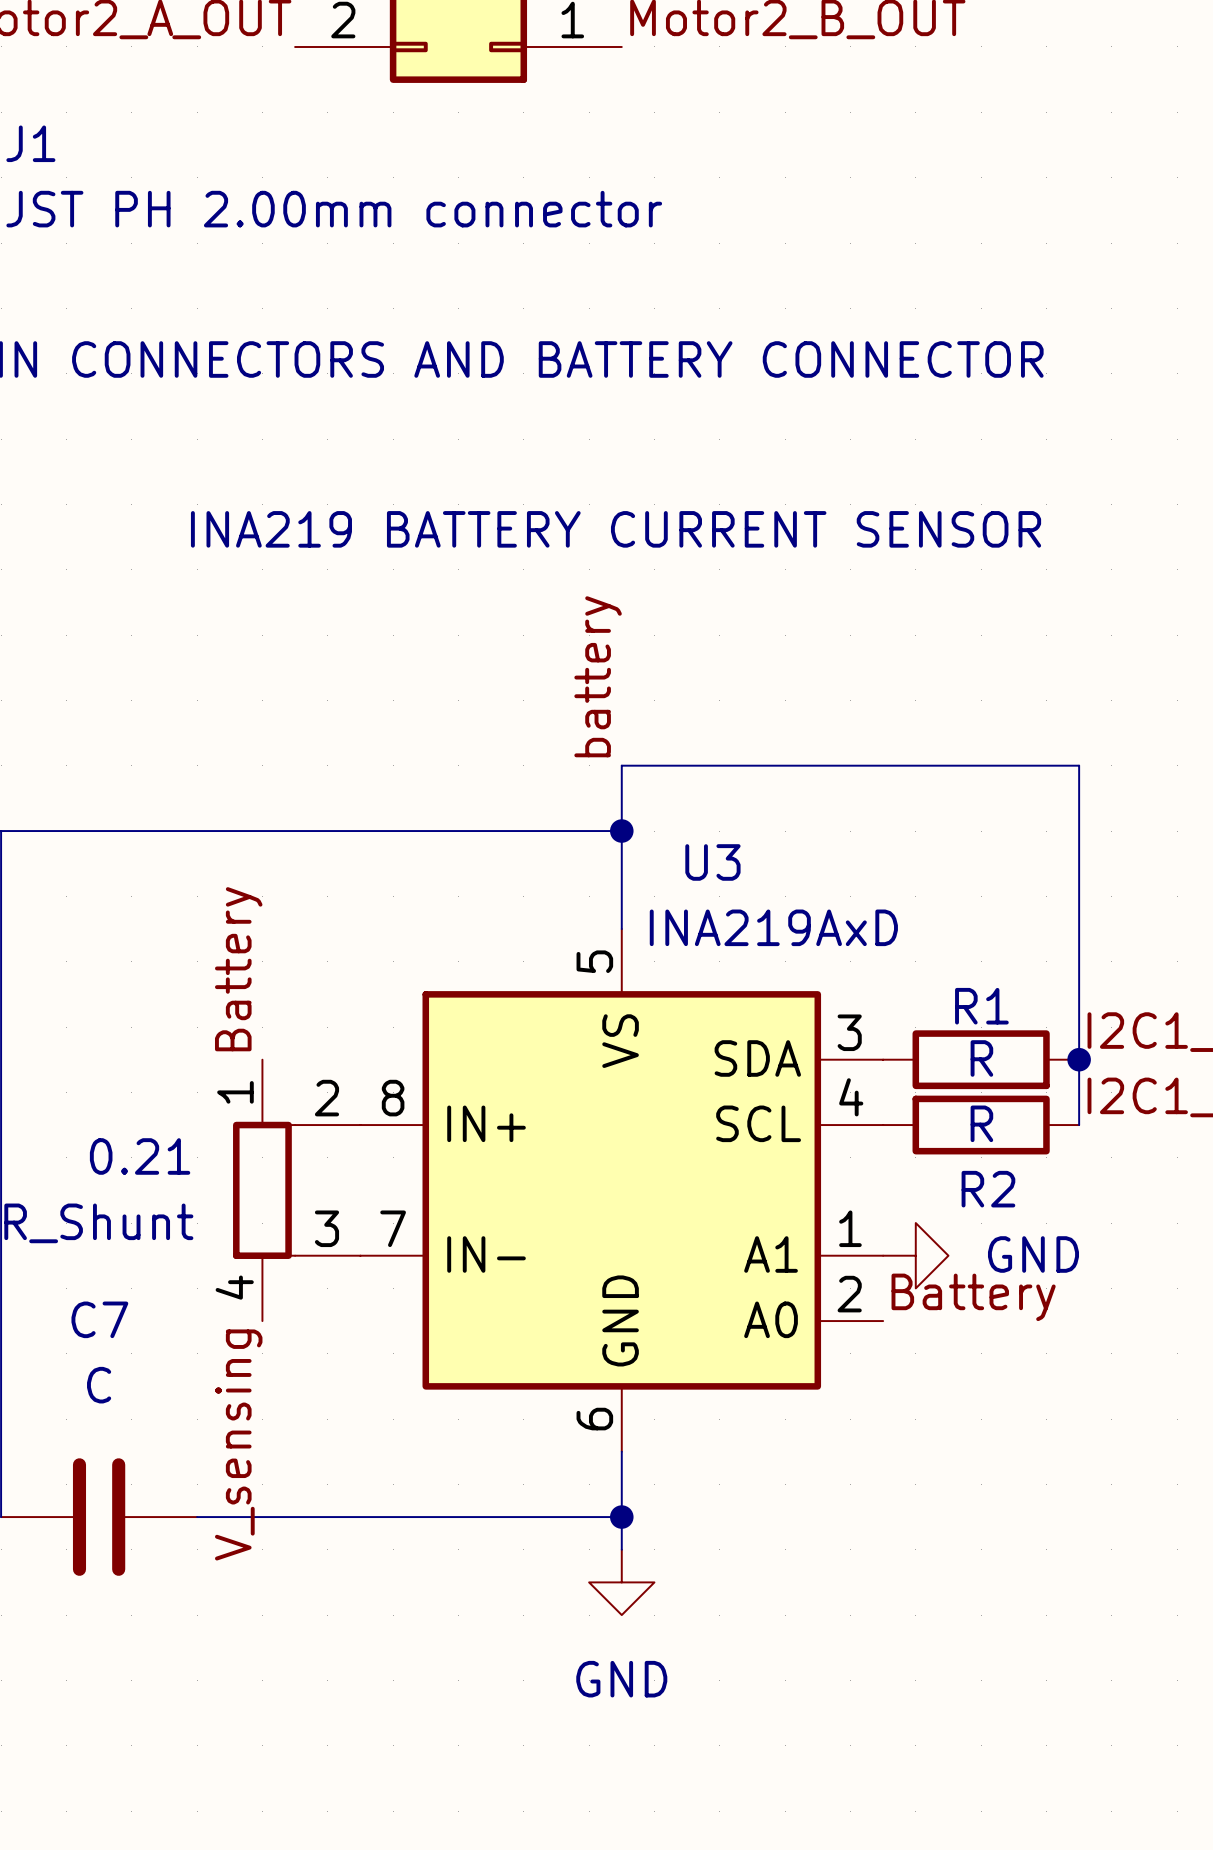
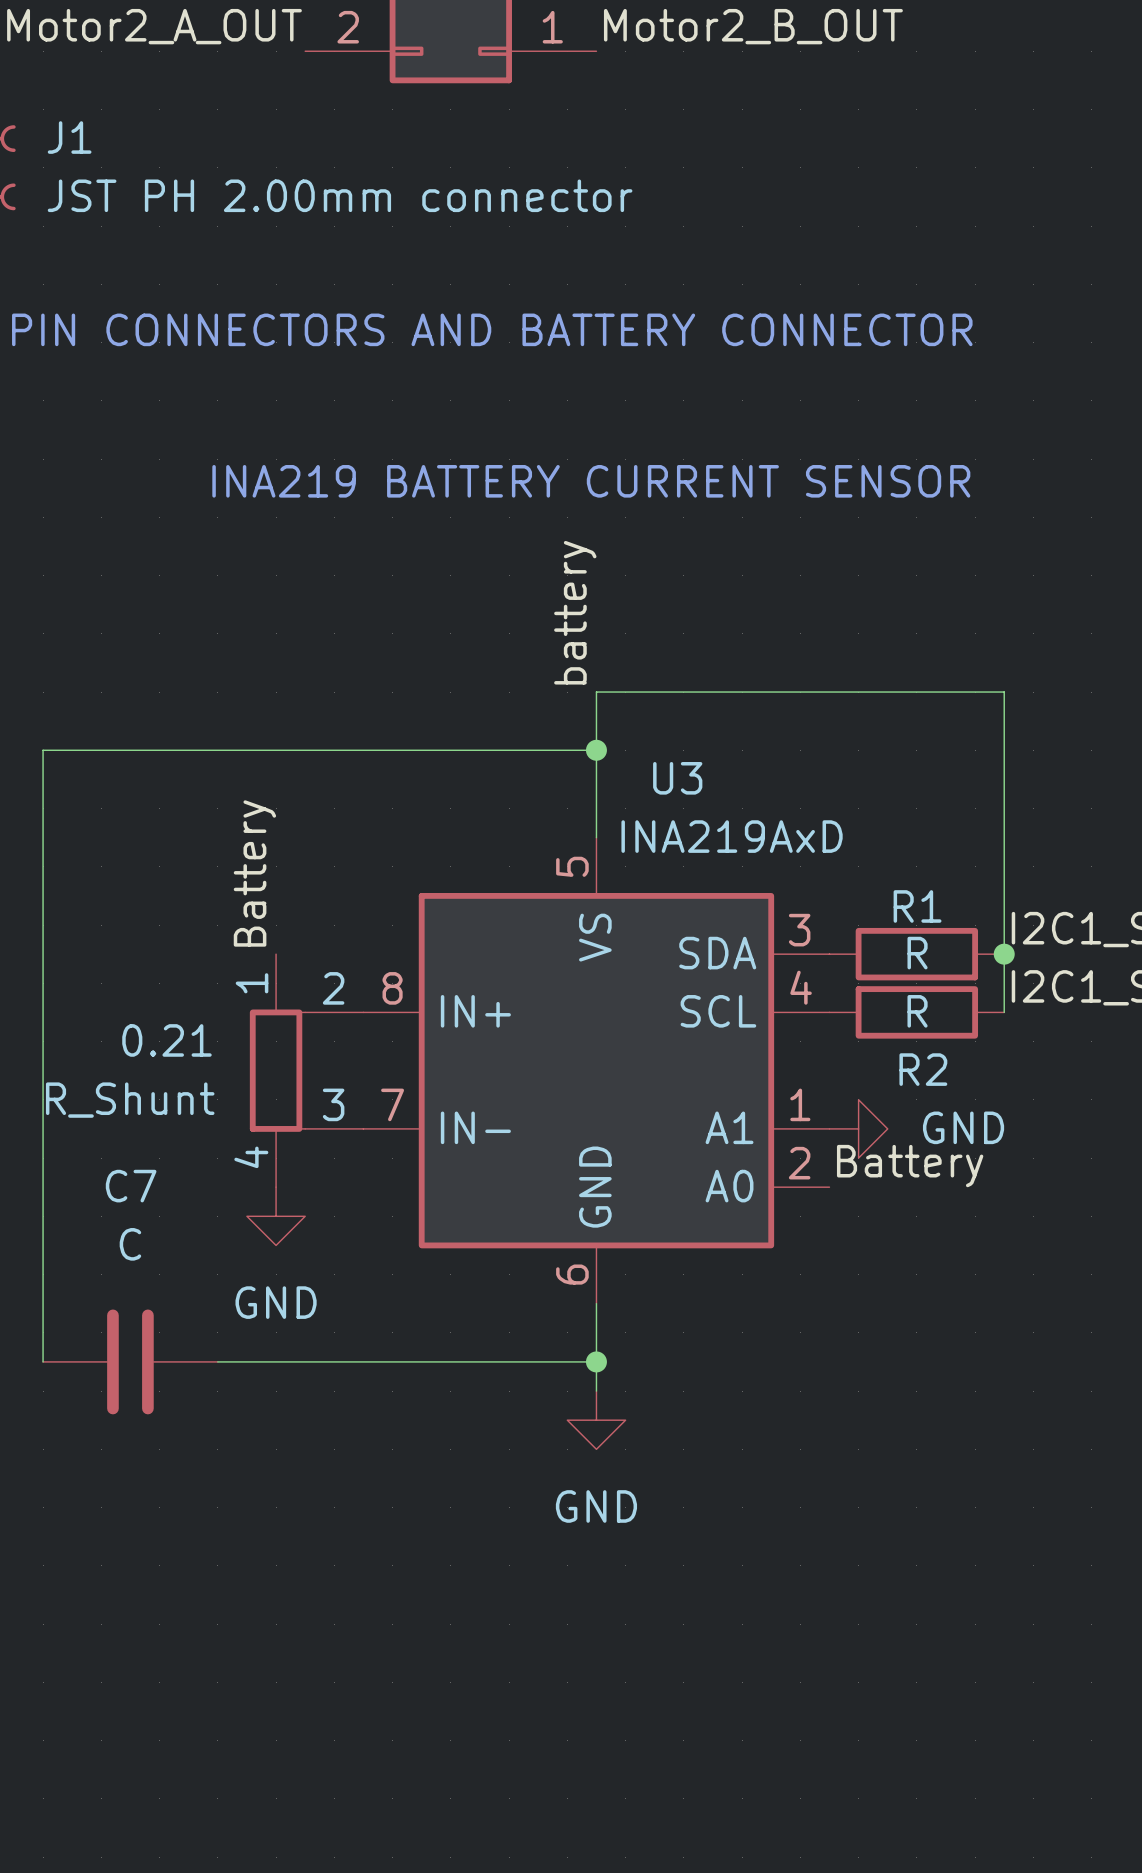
power symbol: none -> GND (276, 1216)
label: V_sensing (238, 1444) -> none

